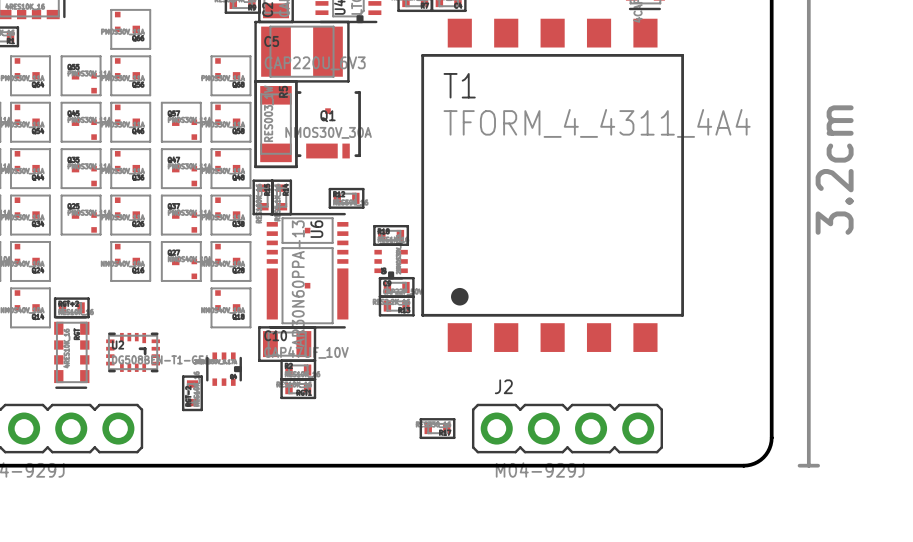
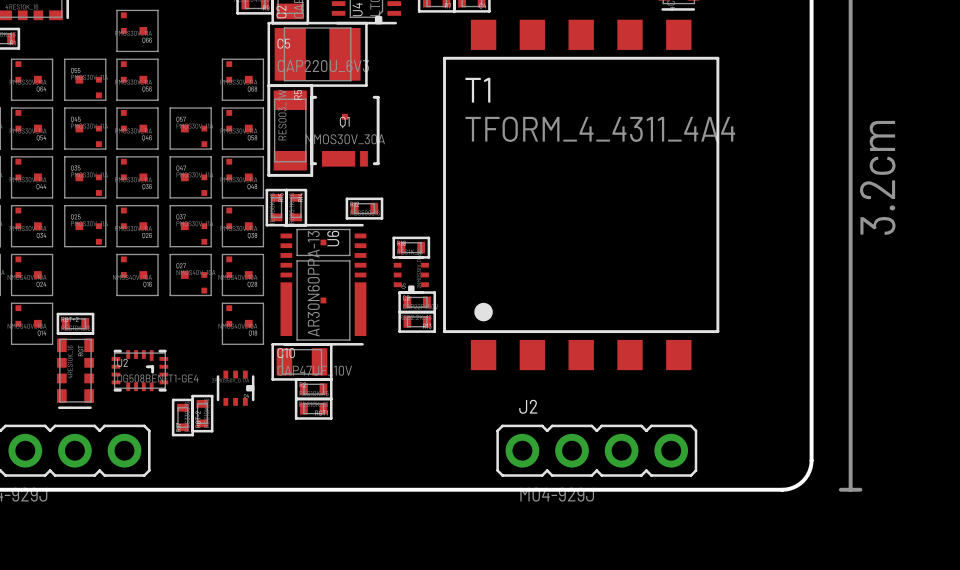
part rotation: 0° (437, 428) -> 90° clockwise (182, 417)
part position: (437, 428) -> (182, 417)

